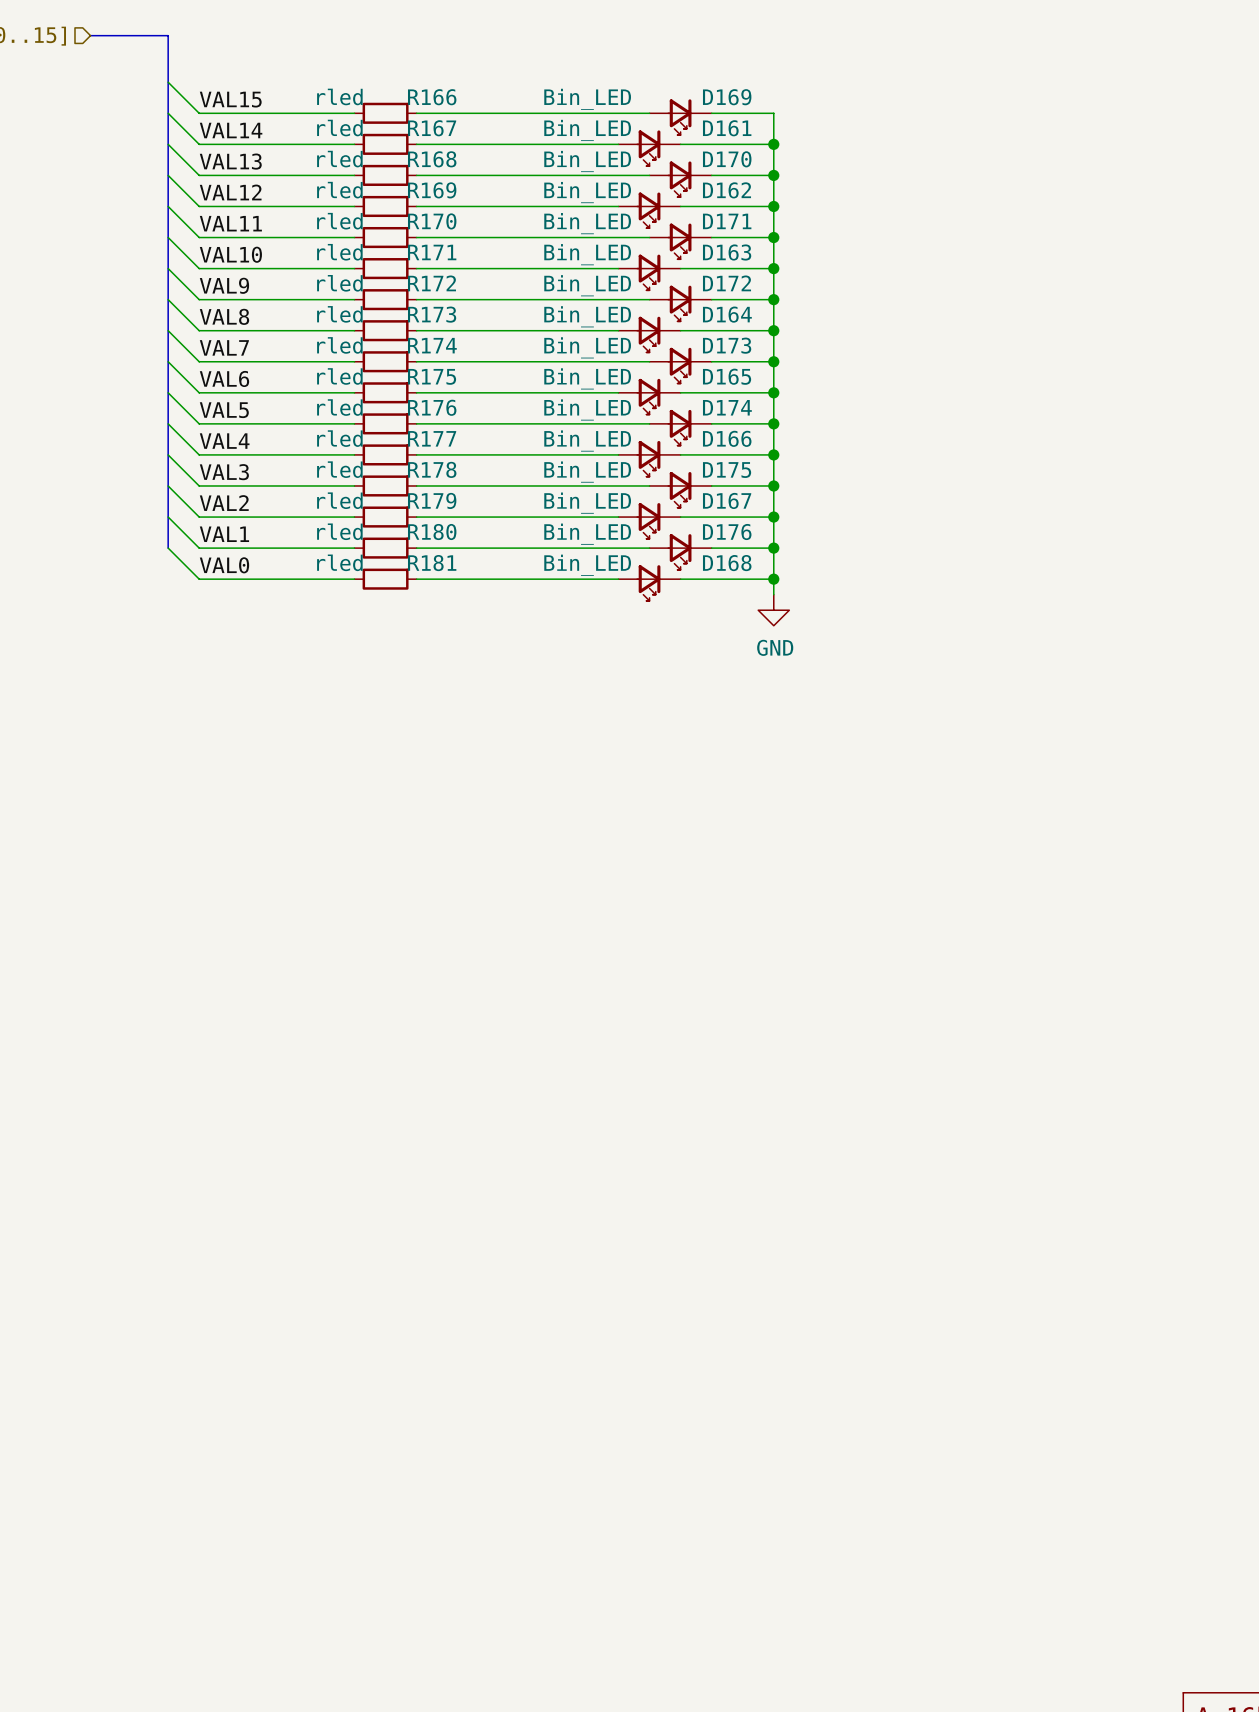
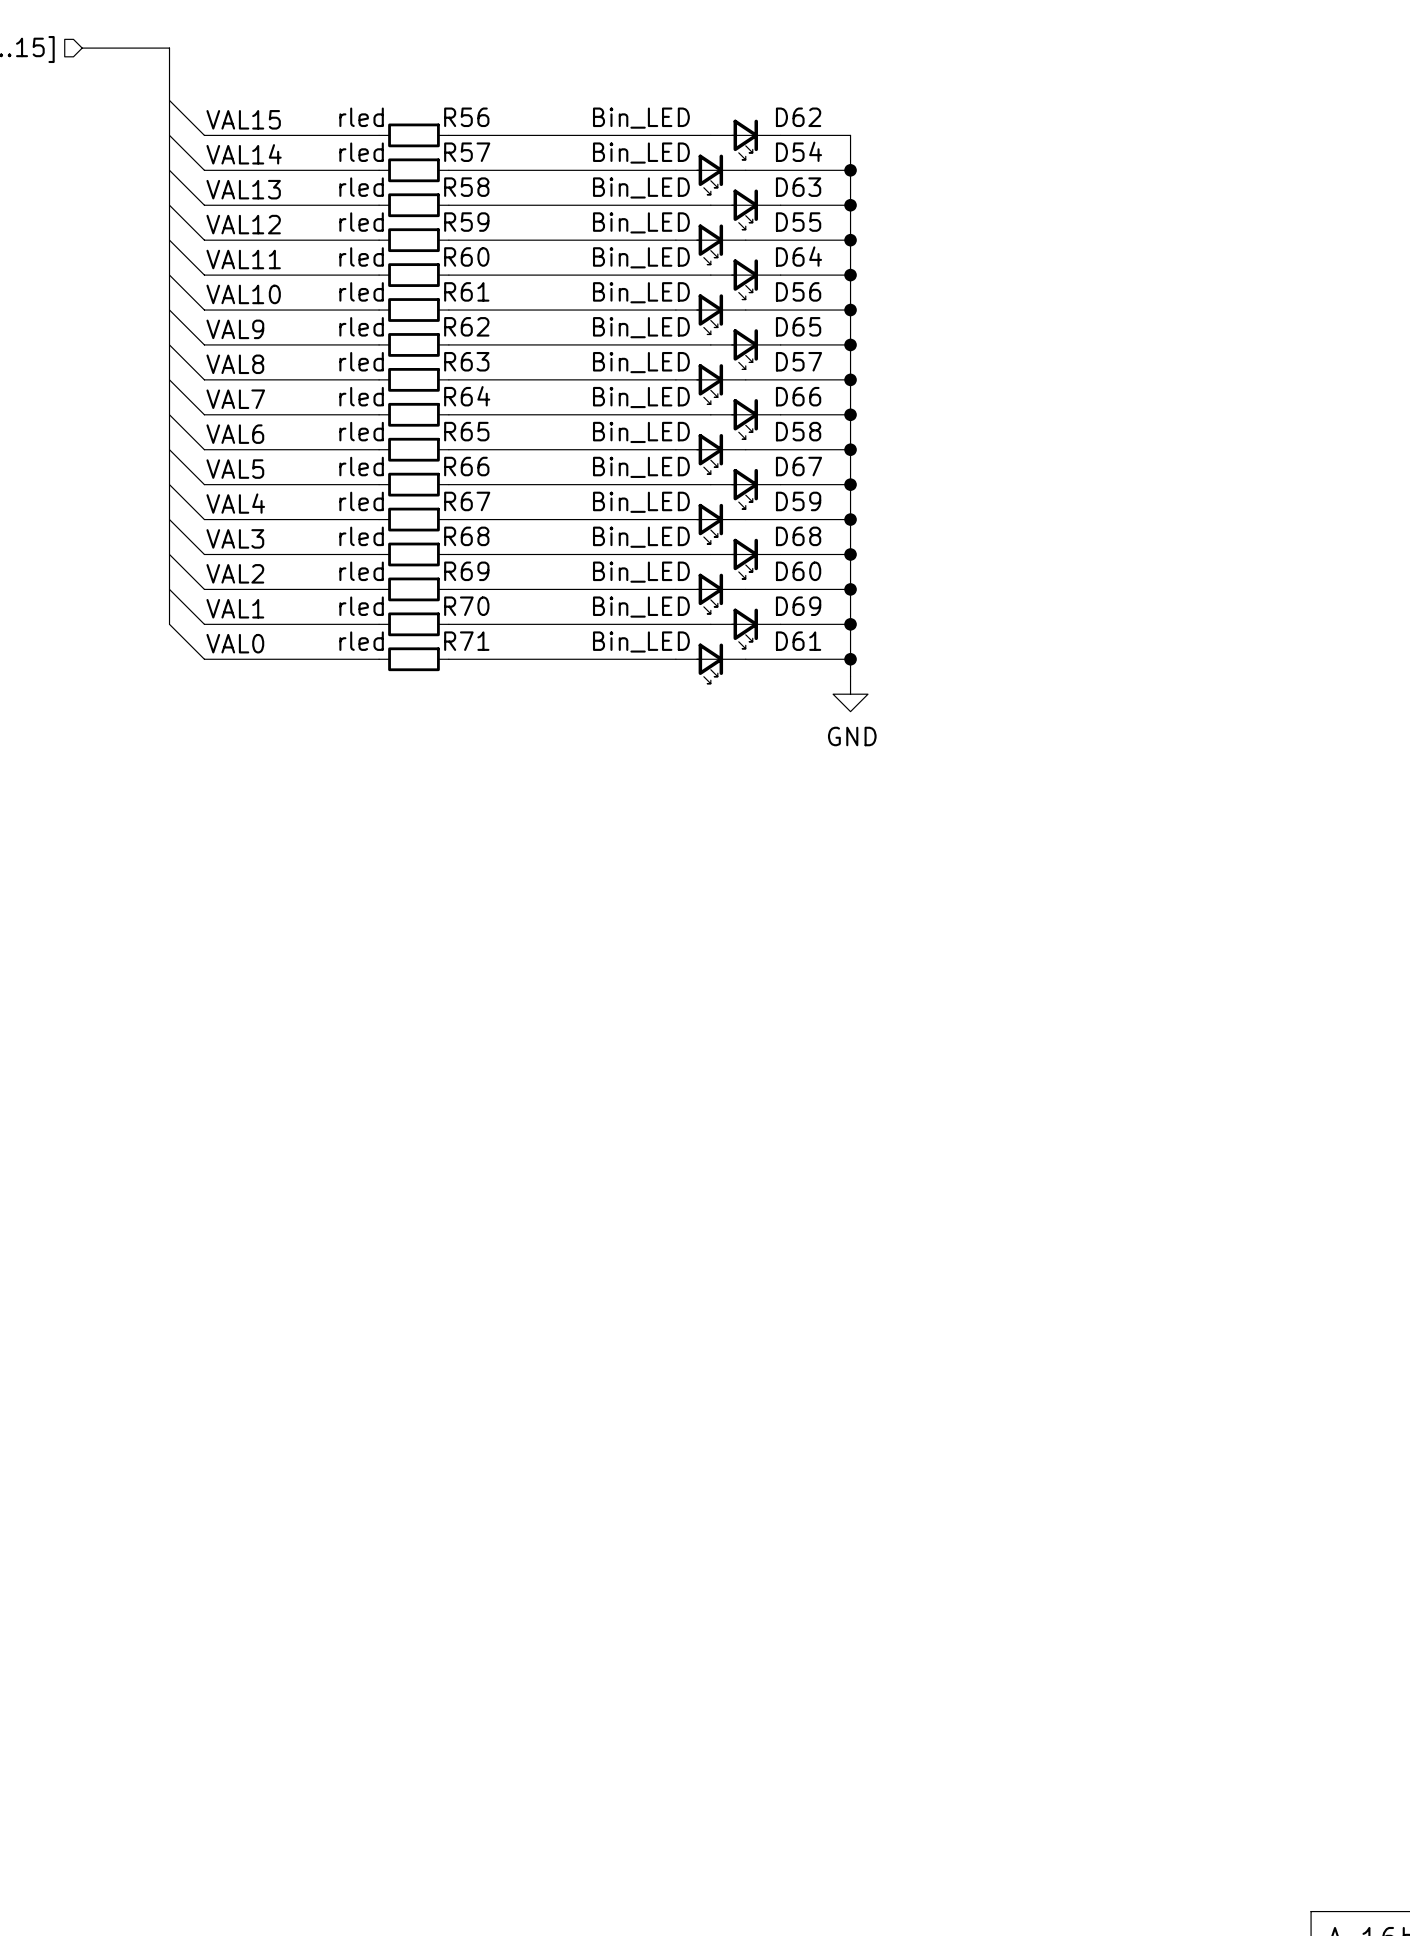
R166 name: R166 (432, 97) -> R56 (466, 117)
D169 name: D169 (727, 97) -> D62 (798, 117)
R167 name: R167 (432, 128) -> R57 (467, 152)
D161 name: D161 (727, 128) -> D54 (798, 151)
R168 name: R168 (432, 159) -> R58 (466, 187)
D170 name: D170 (727, 159) -> D63 (798, 187)
R169 name: R169 (432, 190) -> R59 (466, 222)
D162 name: D162 (727, 190) -> D55 (798, 222)
R170 name: R170 (432, 221) -> R60 (466, 256)
D171 name: D171 (727, 221) -> D64 (798, 256)
R171 name: R171 (432, 252) -> R61 (466, 291)
D163 name: D163 (727, 252) -> D56 (798, 291)
R172 name: R172 (431, 283) -> R62 (466, 326)
D172 name: D172 (727, 283) -> D65 (798, 326)
R173 name: R173 (432, 314) -> R63 (466, 361)
D164 name: D164 (727, 314) -> D57 (798, 361)
R174 name: R174 (432, 345) -> R64 (467, 396)
D173 name: D173 (727, 345) -> D66 (798, 396)
R175 name: R175 (432, 376) -> R65 (466, 431)
D165 name: D165 (727, 376) -> D58 (798, 431)
R176 name: R176 (432, 407) -> R66 (466, 466)
D174 name: D174 (727, 407) -> D67 (798, 466)
R177 name: R177 (432, 438) -> R67 (467, 501)
D166 name: D166 (727, 438) -> D59 (798, 501)
R178 name: R178 (432, 469) -> R68 (466, 536)
D175 name: D175 (727, 470) -> D68 (798, 536)
R179 name: R179 (432, 500) -> R69 (466, 571)
D167 name: D167 (727, 500) -> D60 (798, 571)
R180 name: R180 (432, 532) -> R70 (466, 606)
D176 name: D176 (727, 532) -> D69 (798, 606)
R181 name: R181 (432, 563) -> R71 (466, 641)
D168 name: D168 (727, 563) -> D61 (798, 641)

